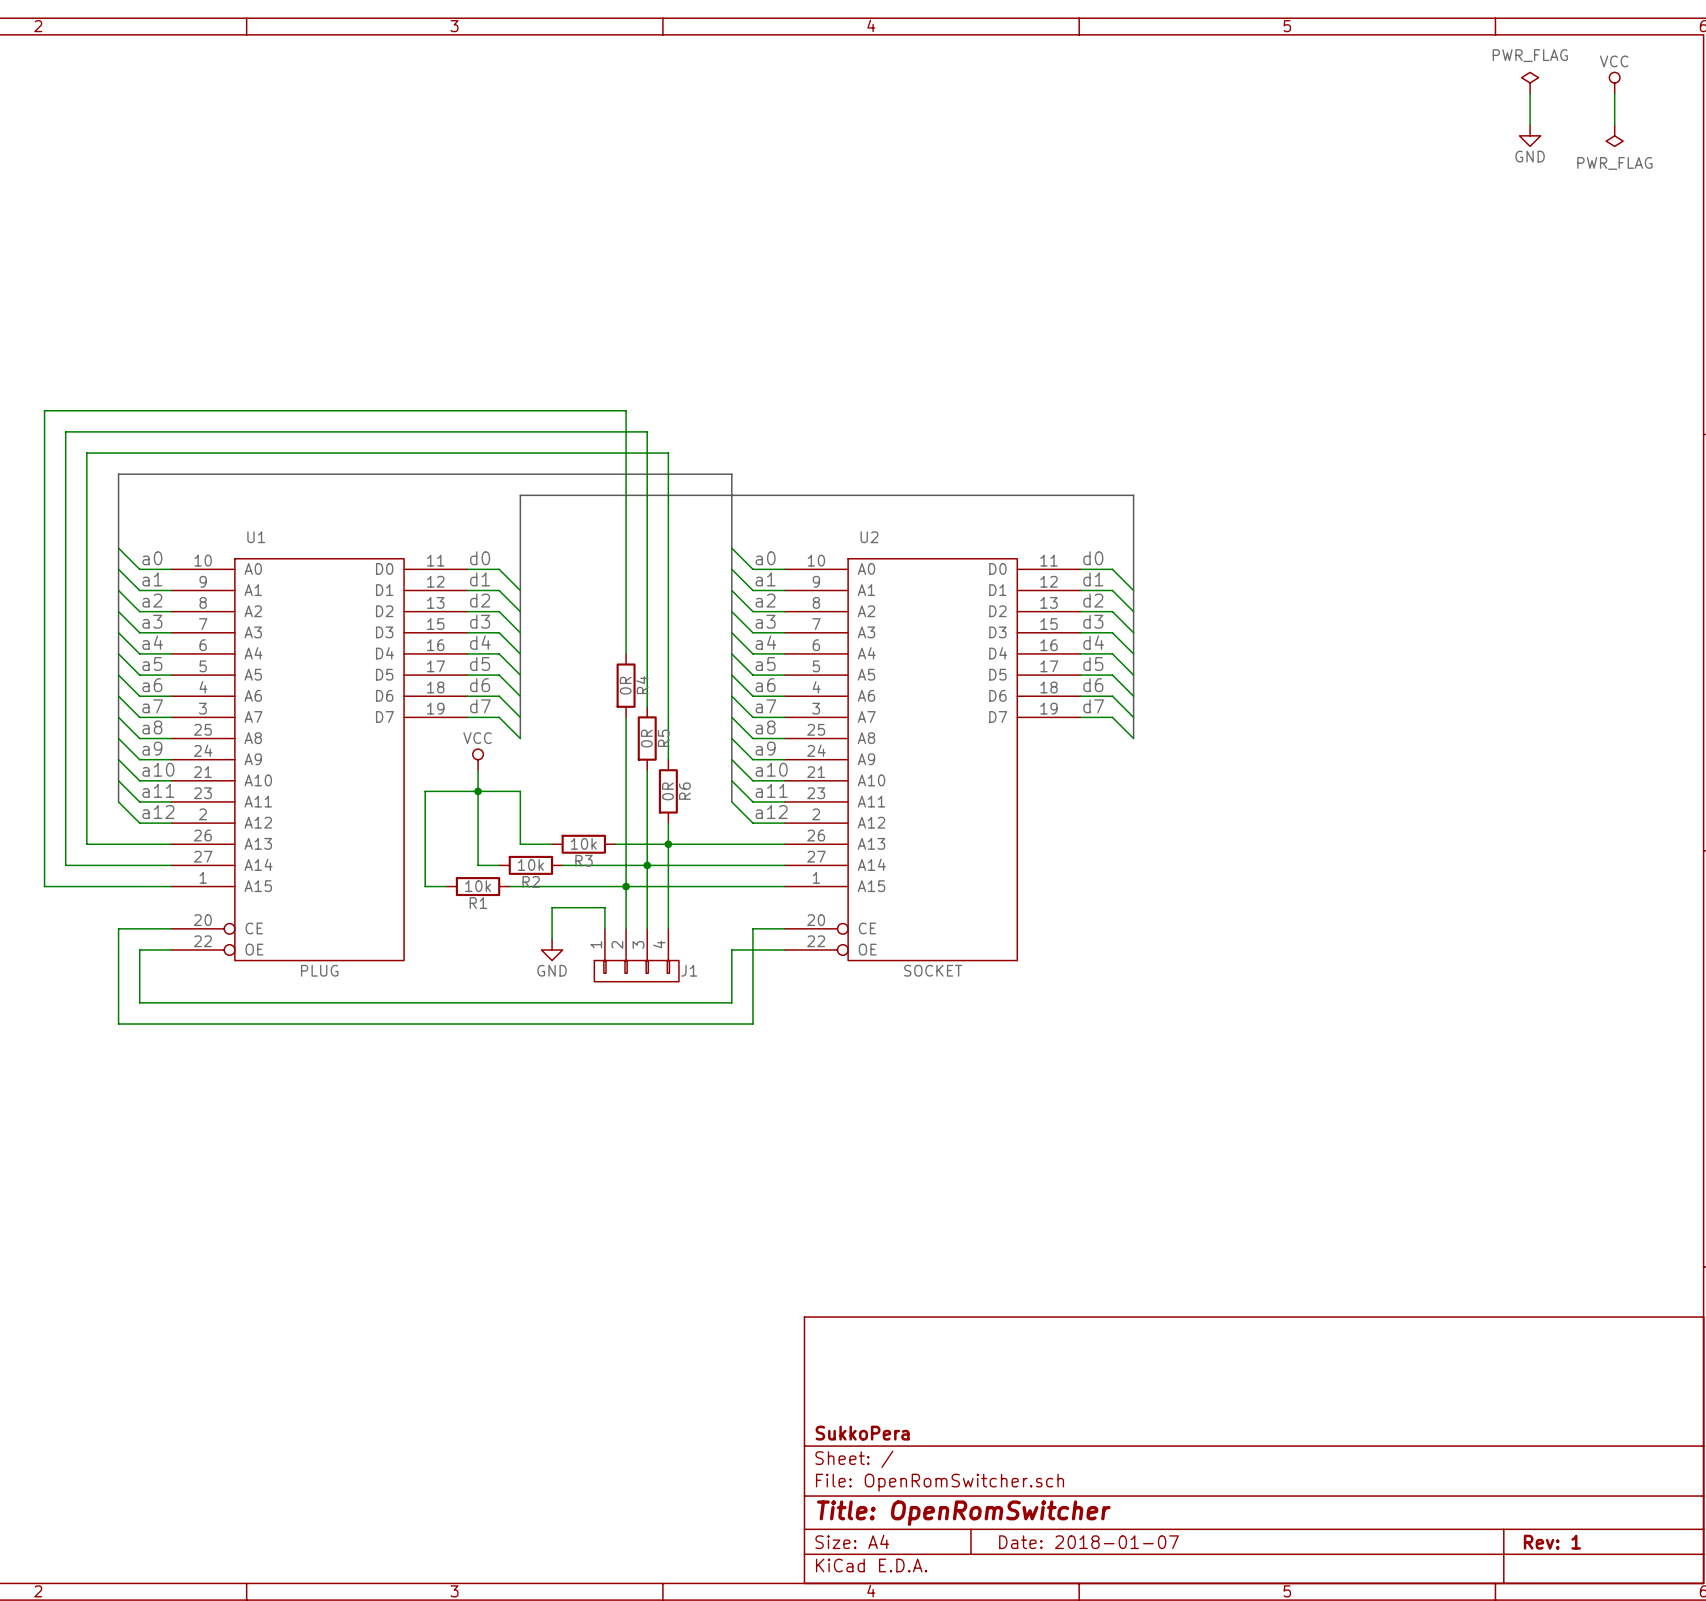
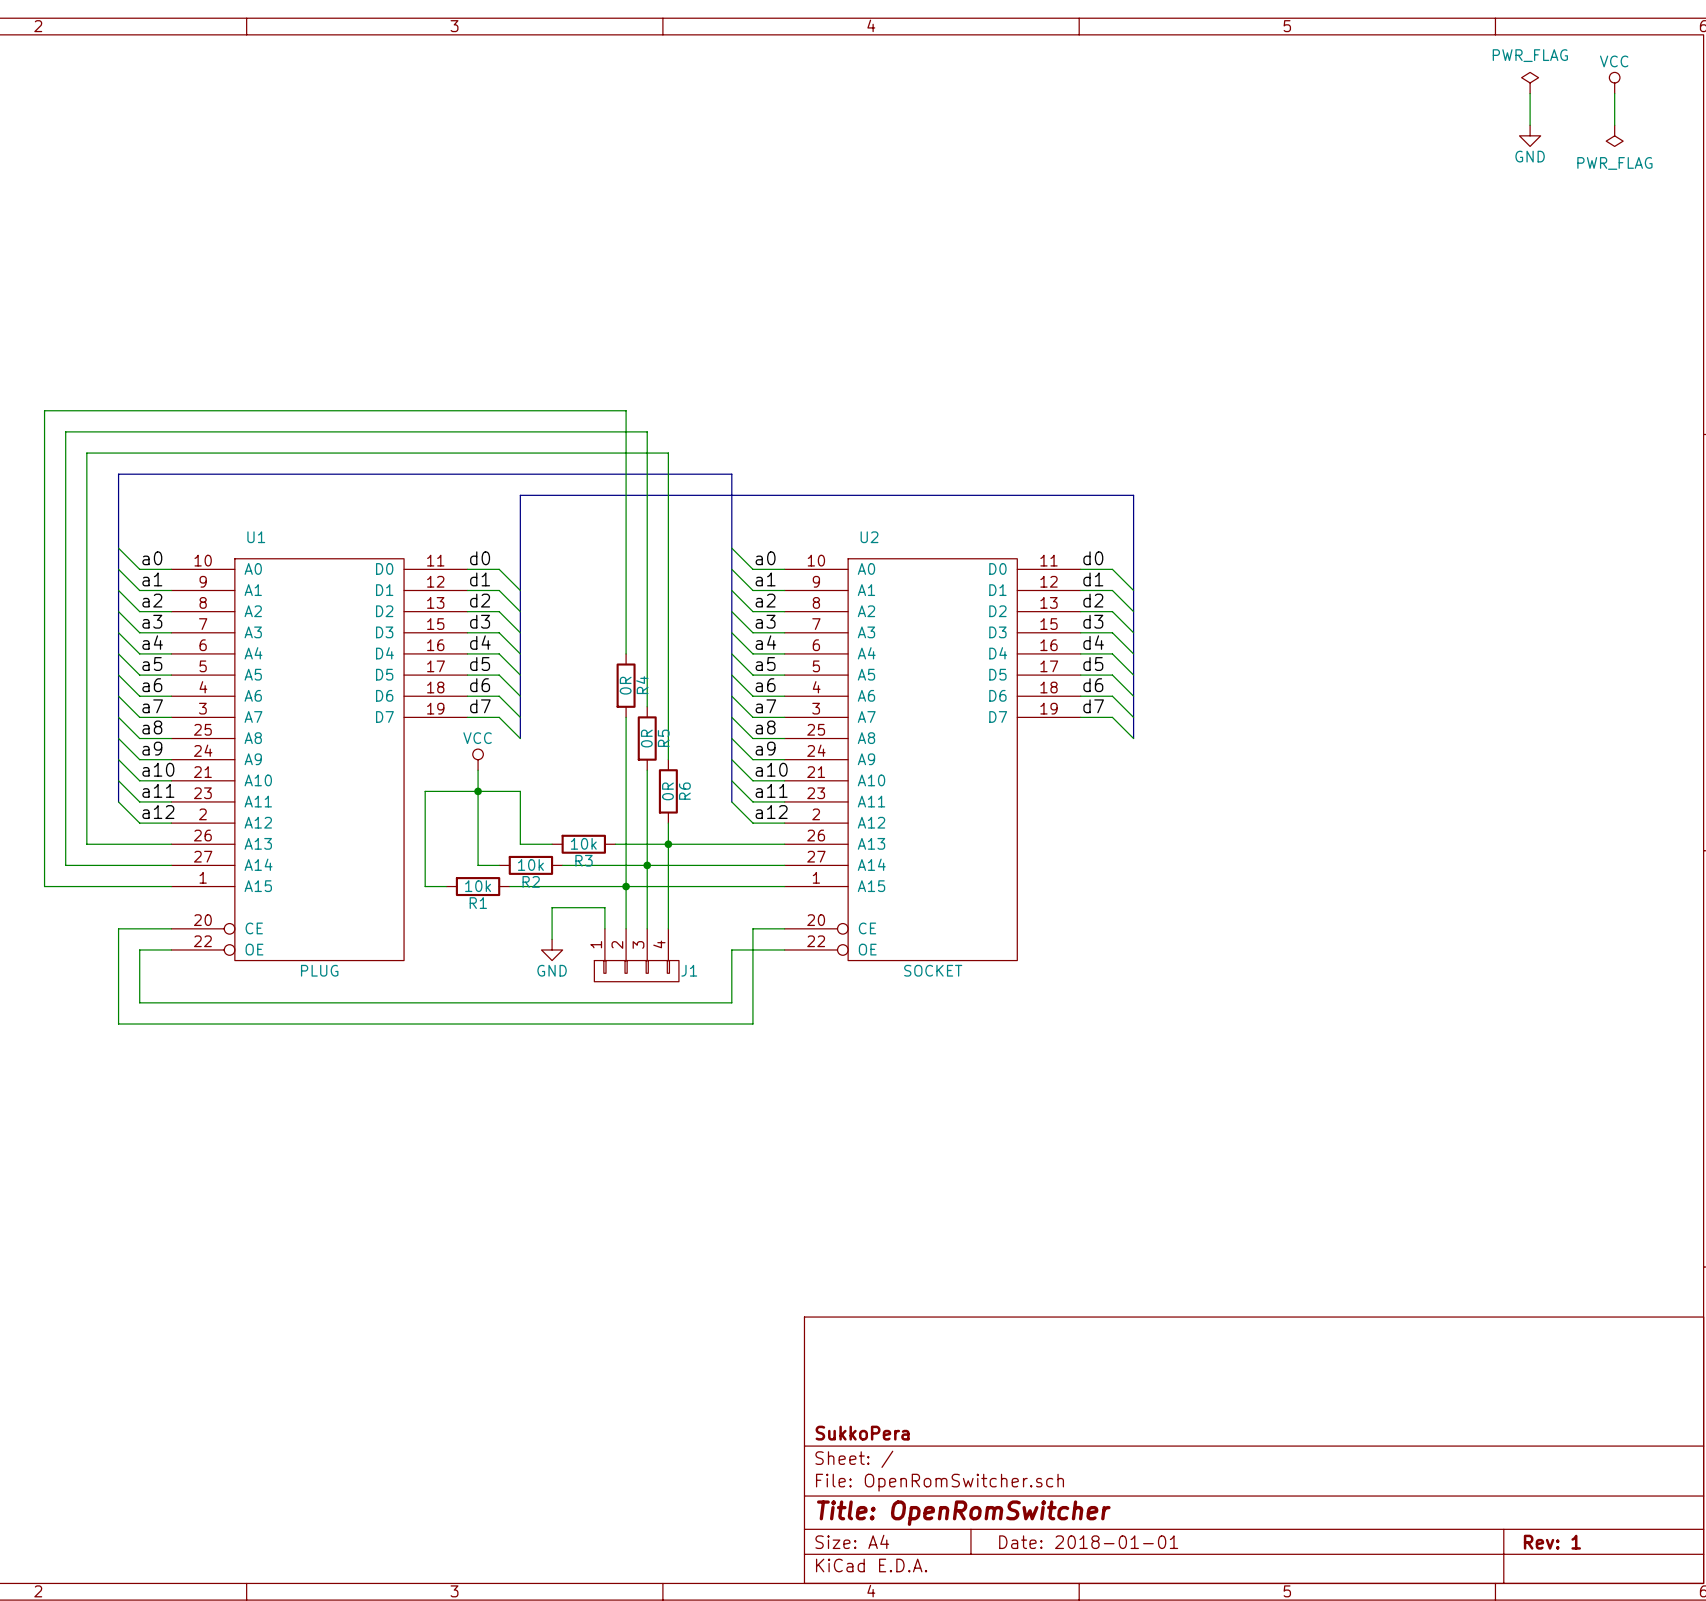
title block: Date: 2018-01-07 (1088, 1542) -> Date: 2018-01-01 (1088, 1542)

